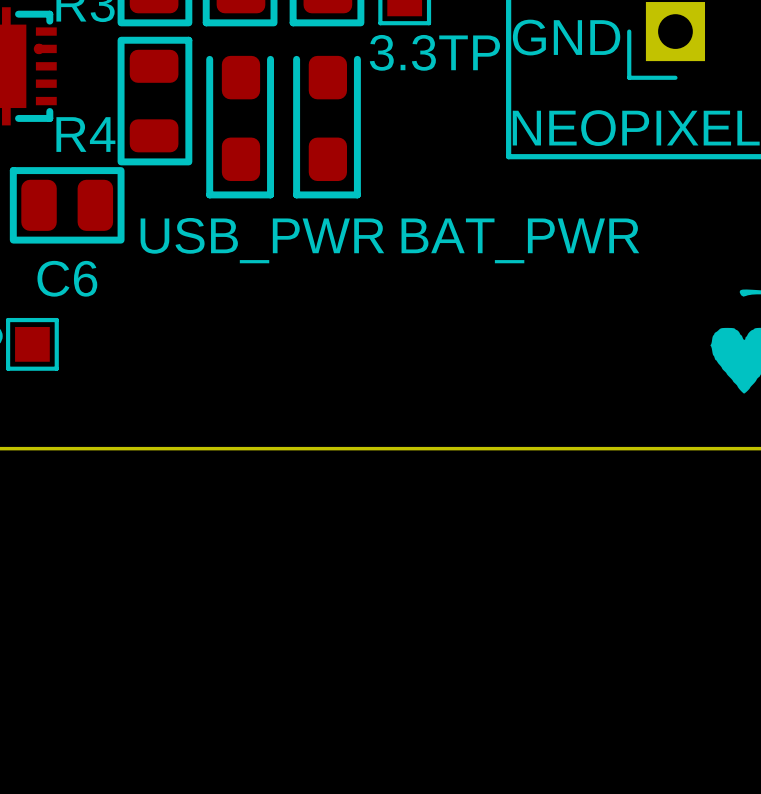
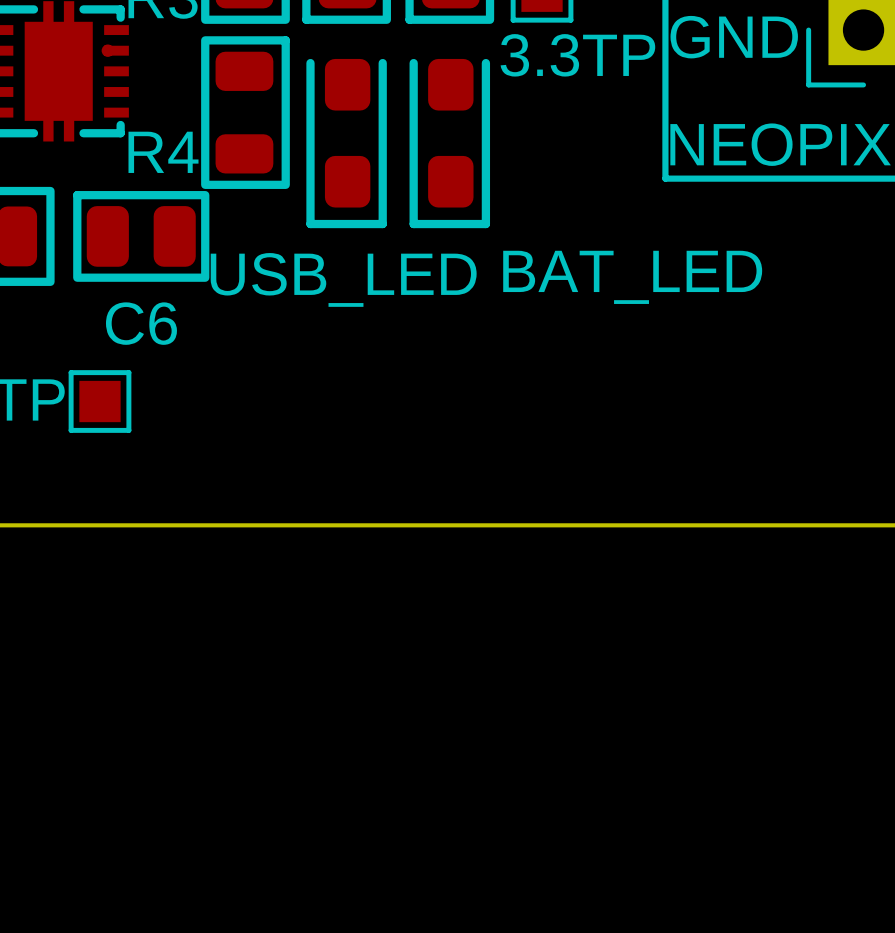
text: USB_PWR (262, 240) -> USB_LED (343, 279)
text: BAT_PWR (520, 240) -> BAT_LED (632, 277)

